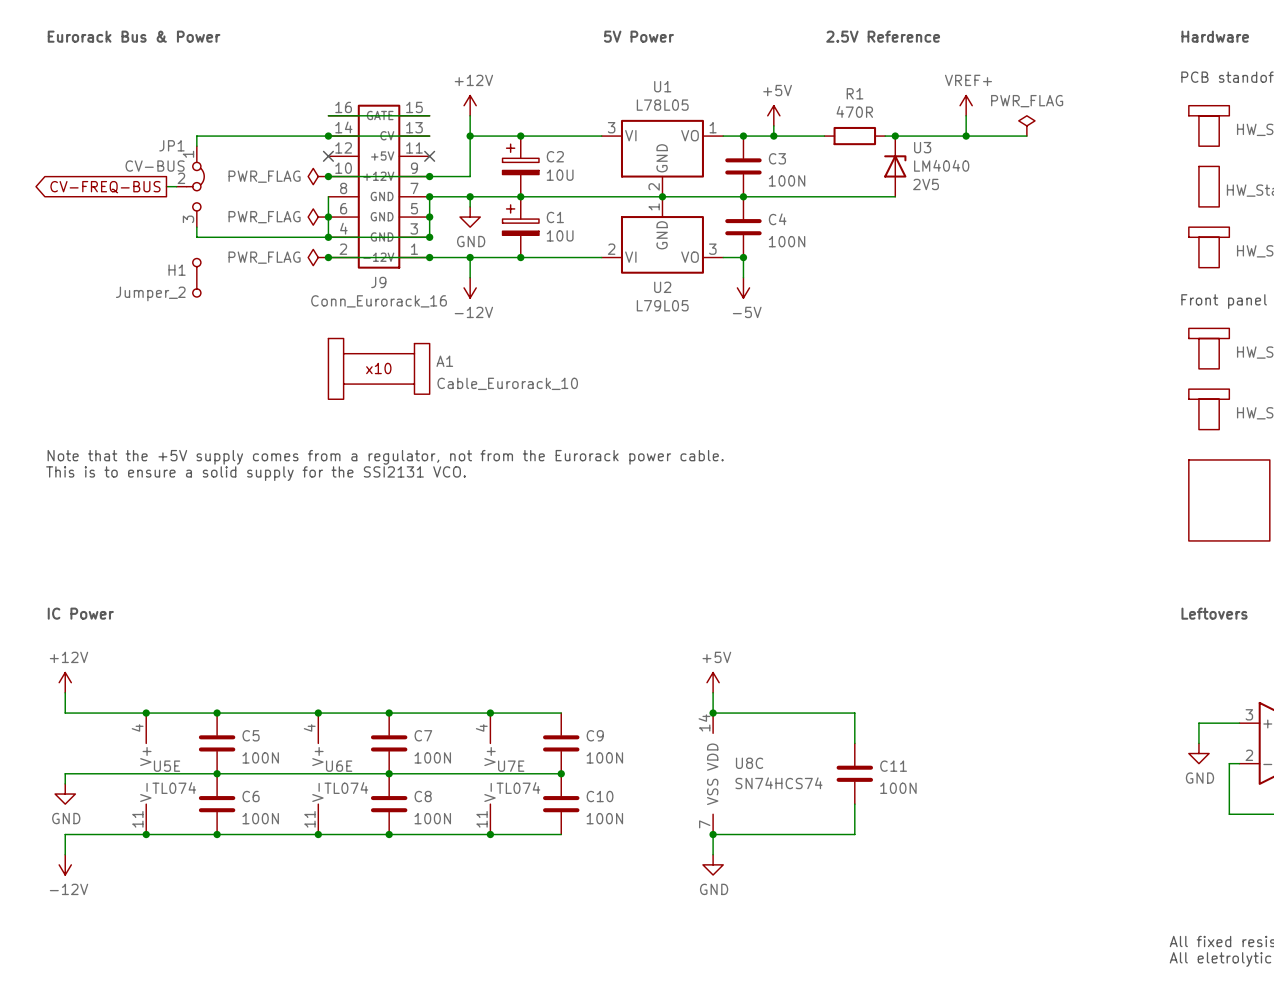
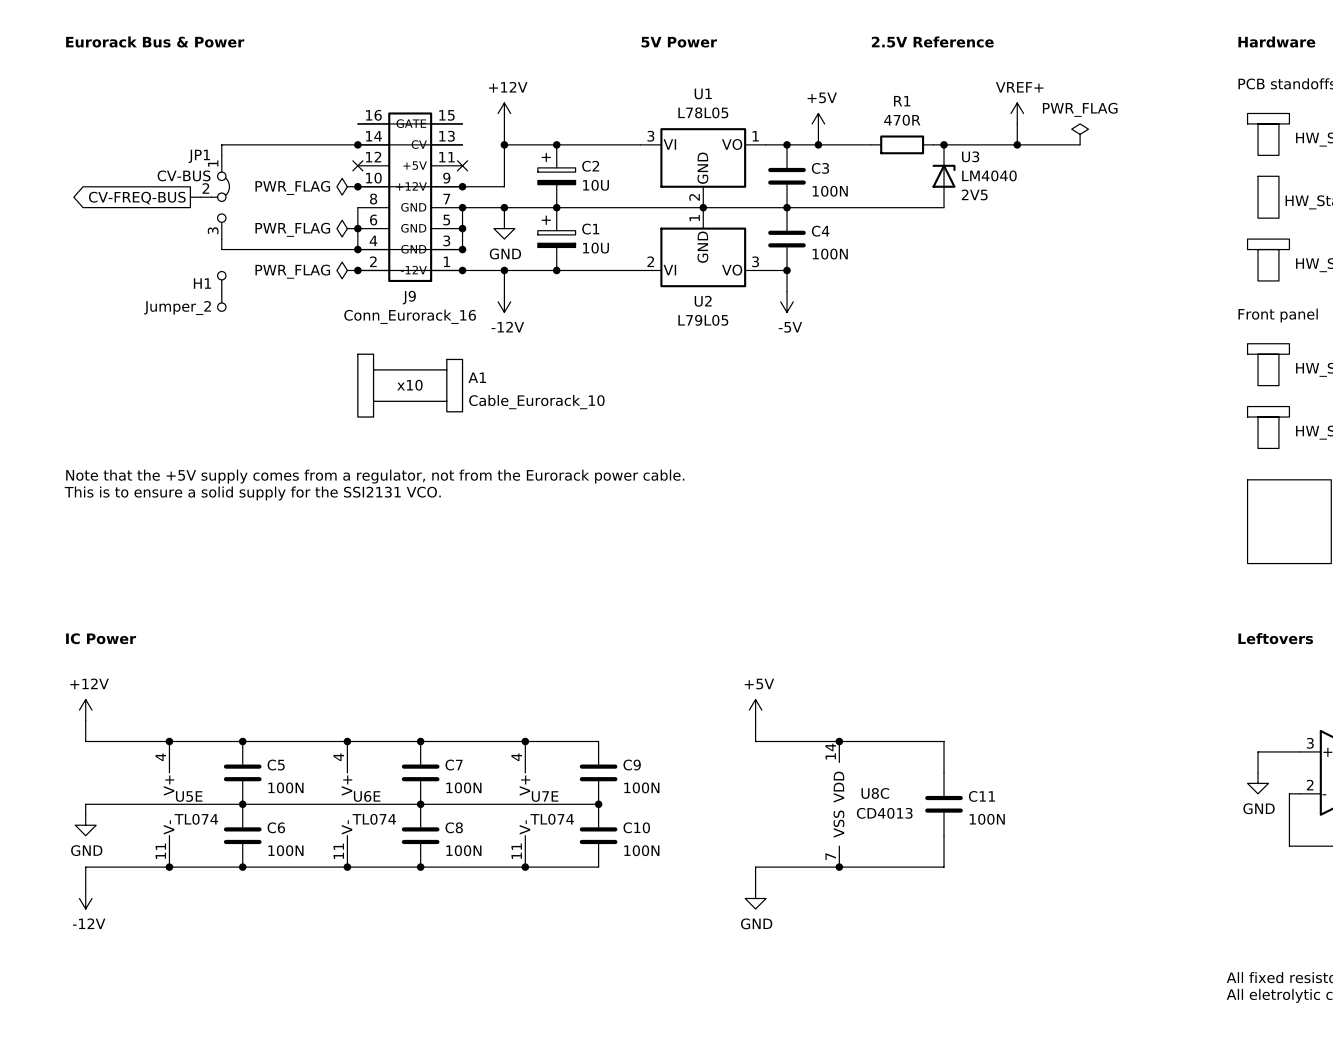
junction: (713, 713) -> none
junction: none -> (839, 741)
wire: (854, 713) (854, 743) -> (902, 741) (944, 741) (944, 772)
U8C position: (713, 773) -> (839, 804)
C11 position: (854, 773) -> (944, 804)
U8C value: SN74HCS74 (778, 783) -> CD4013 (884, 813)
wire: (854, 804) (854, 834) -> (944, 835) (944, 867) (902, 867)
junction: (713, 834) -> none
junction: none -> (839, 867)

